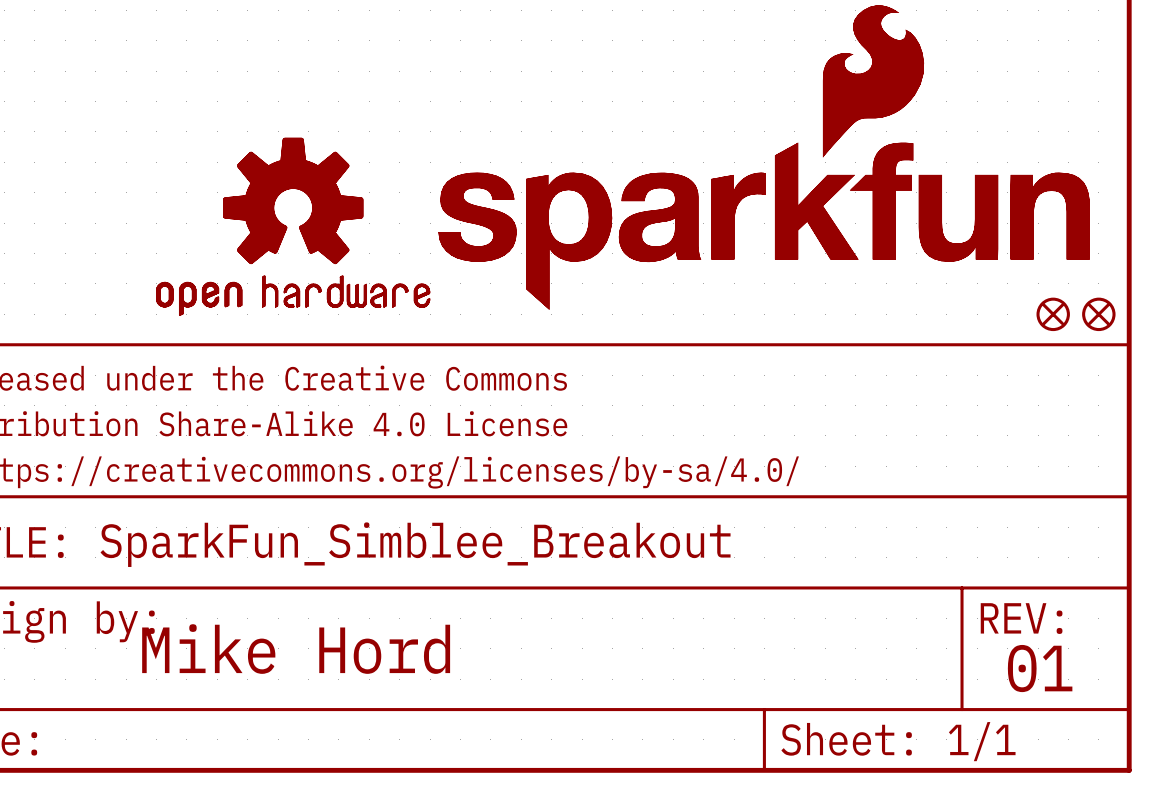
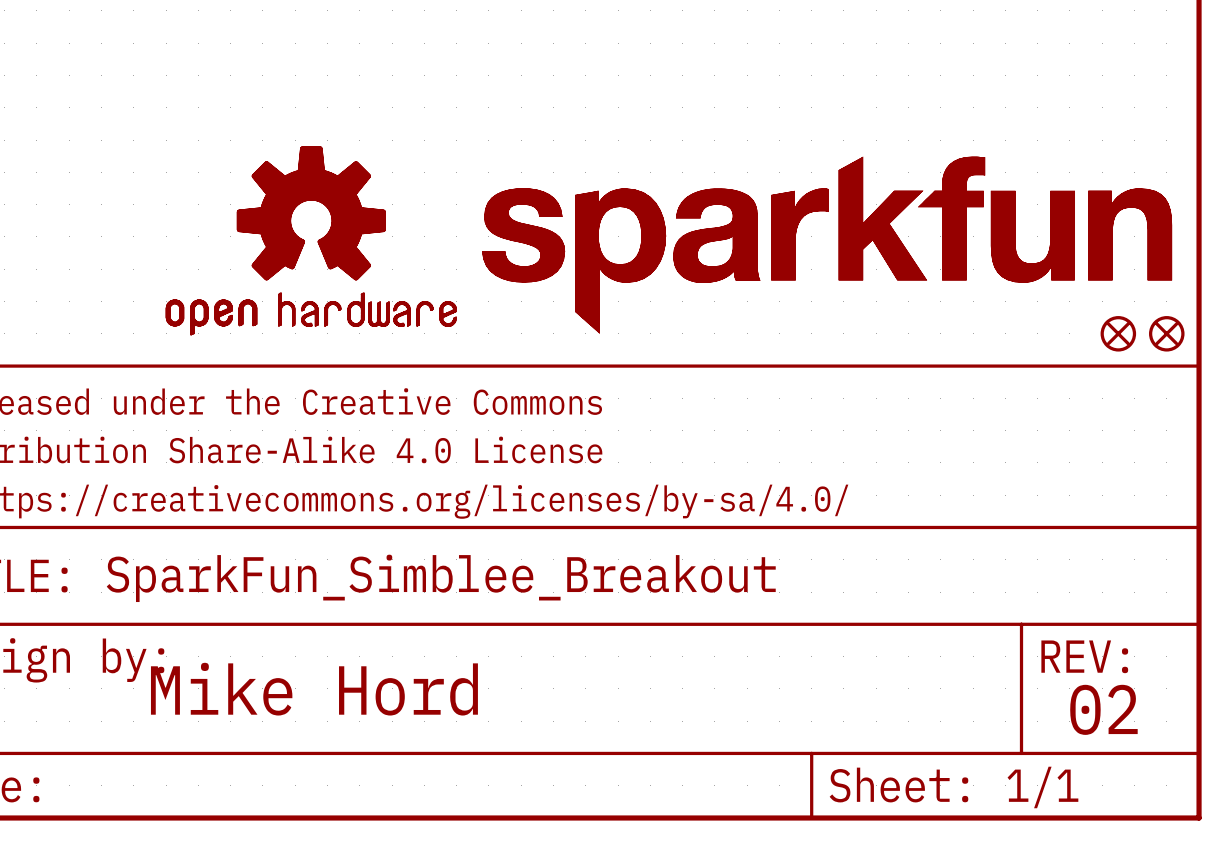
part: (764, 157) -> none
part: none -> (827, 245)
text: 01 (1040, 668) -> 02 (1103, 709)

